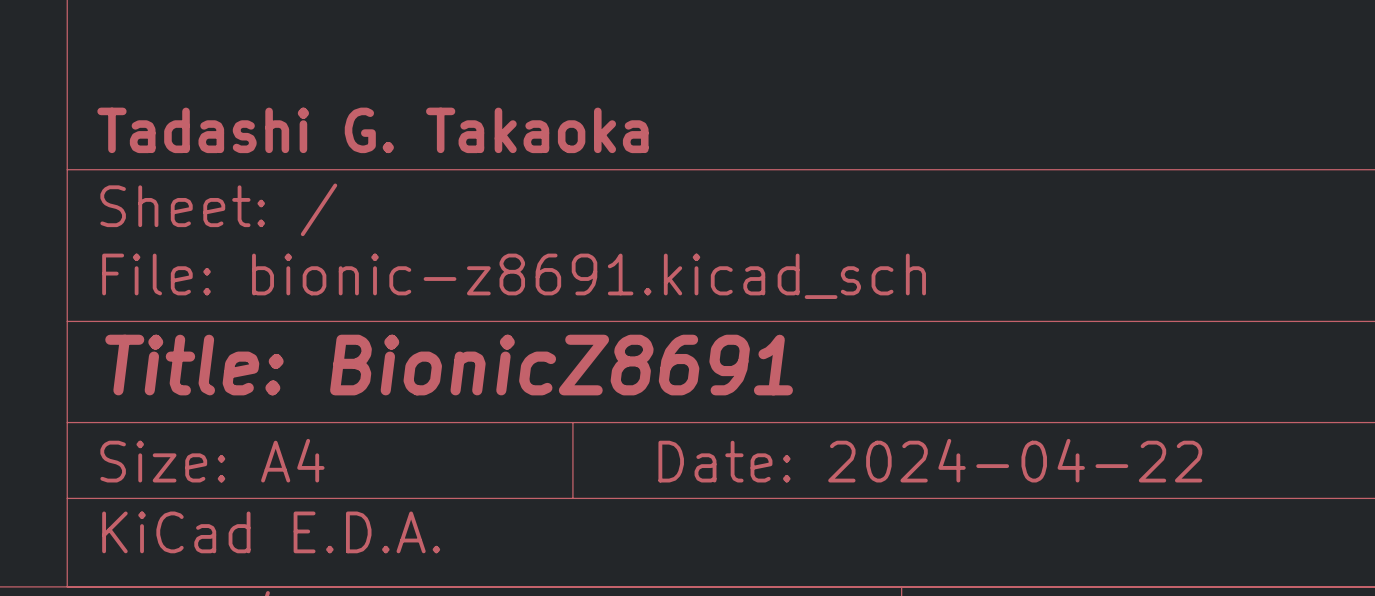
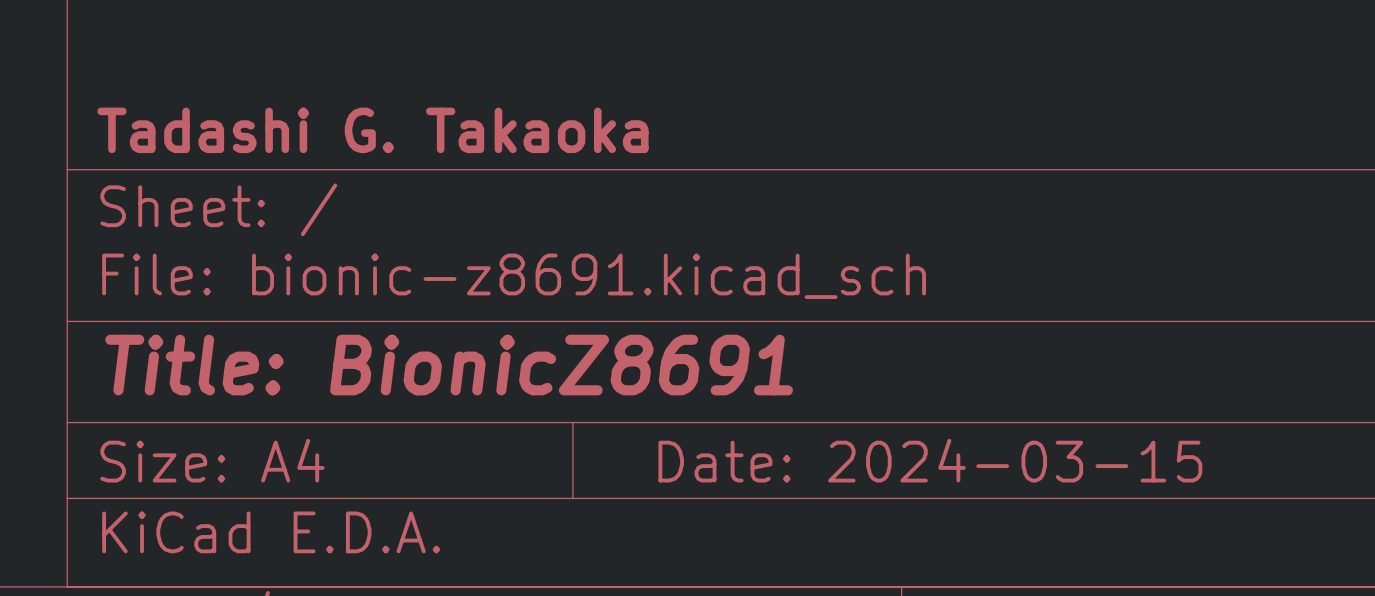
title block: Date: 2024-04-22 (930, 460) -> Date: 2024-03-15 (930, 460)

